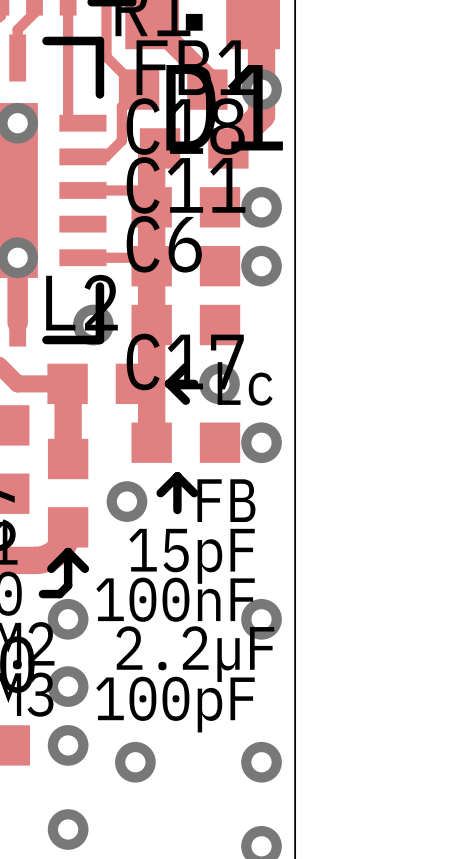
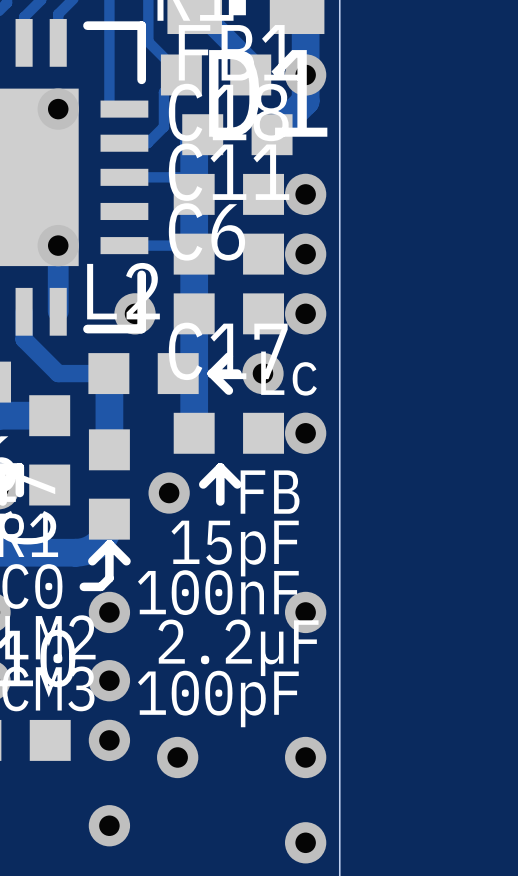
via: none -> (305, 313)

